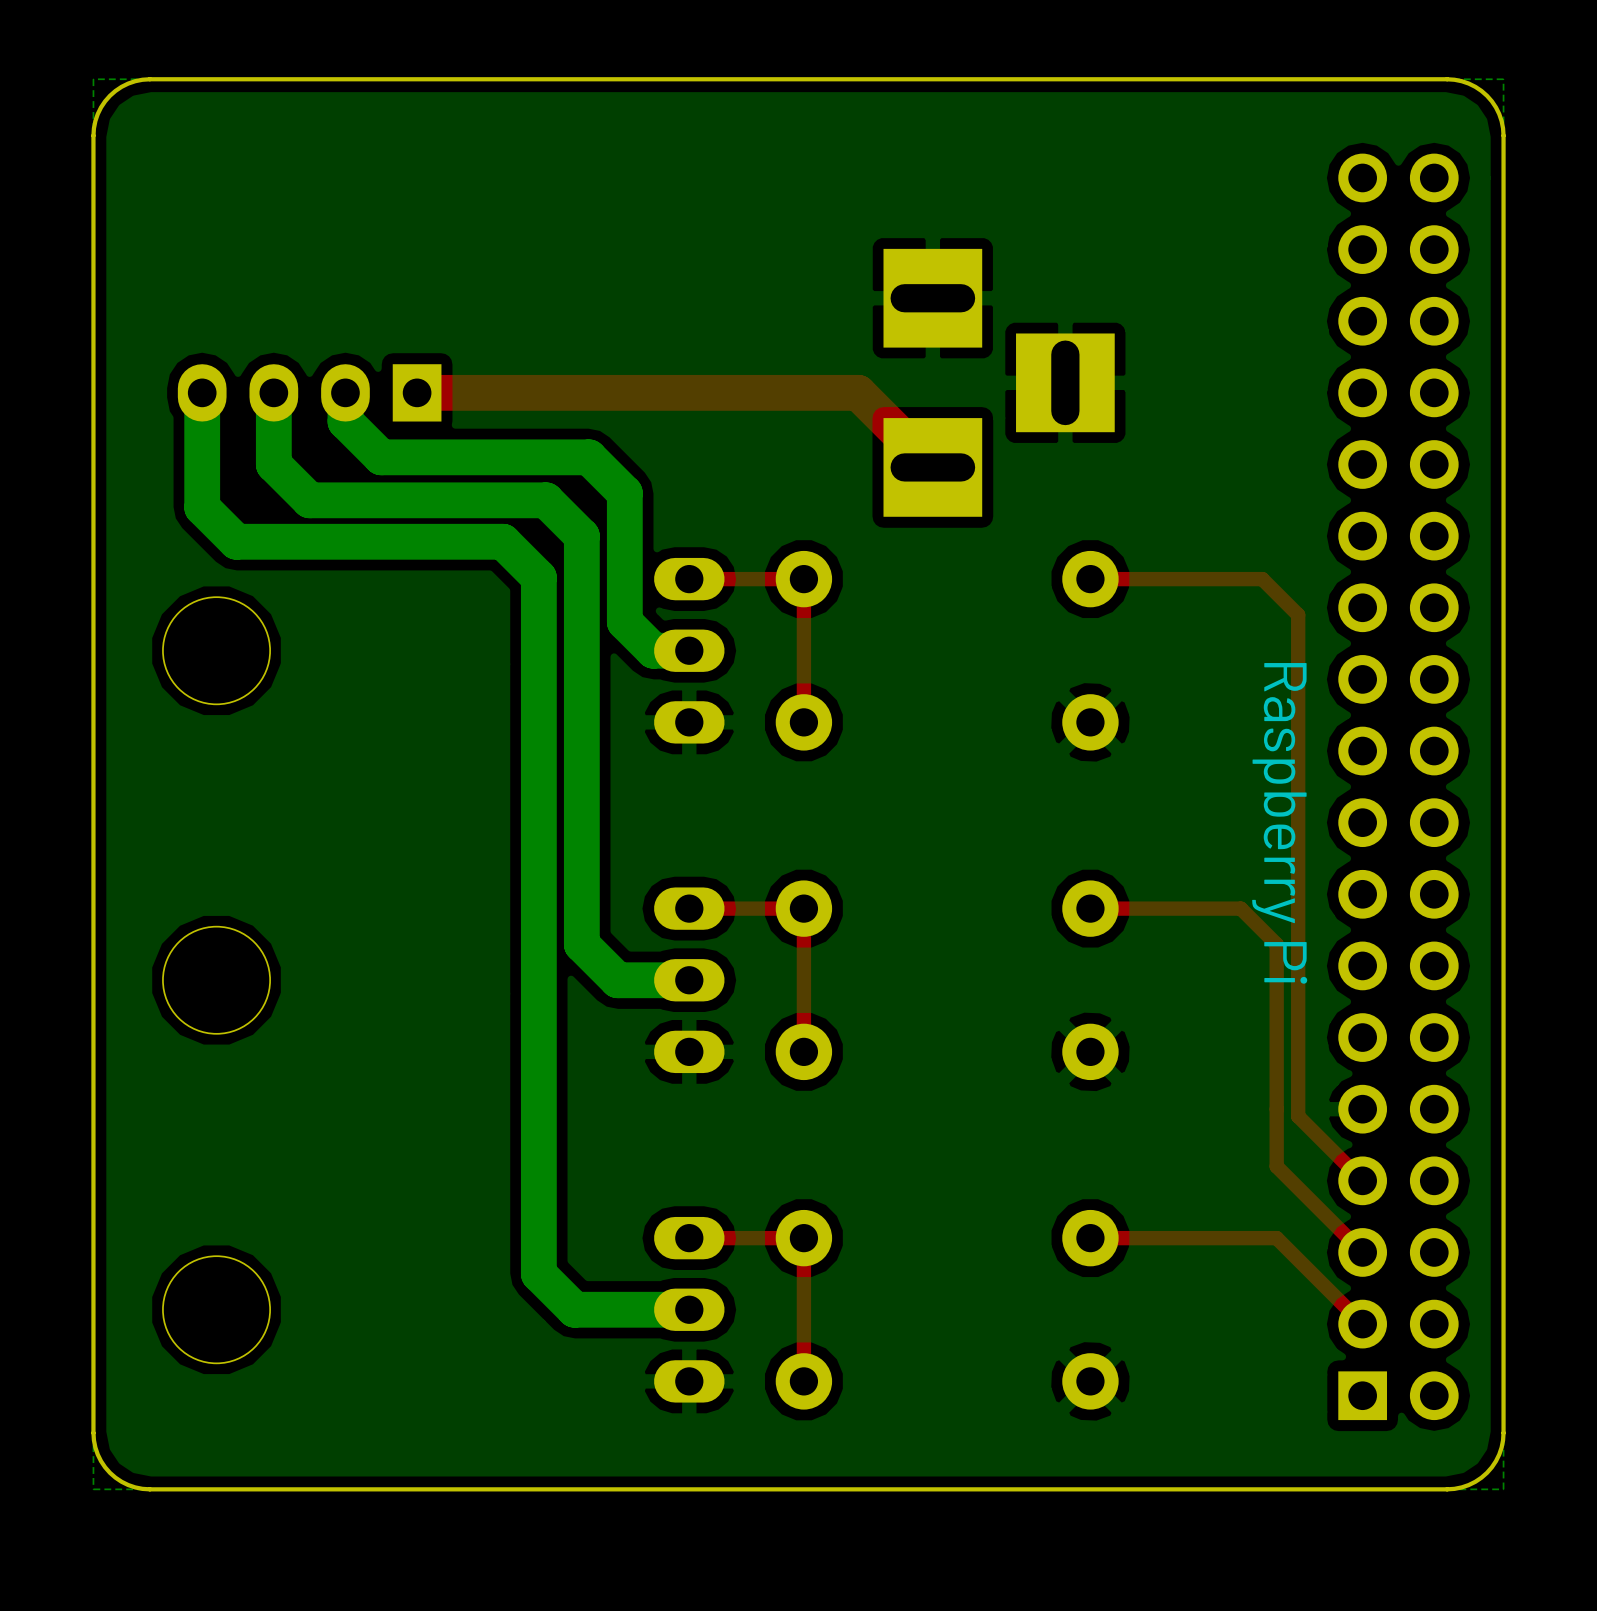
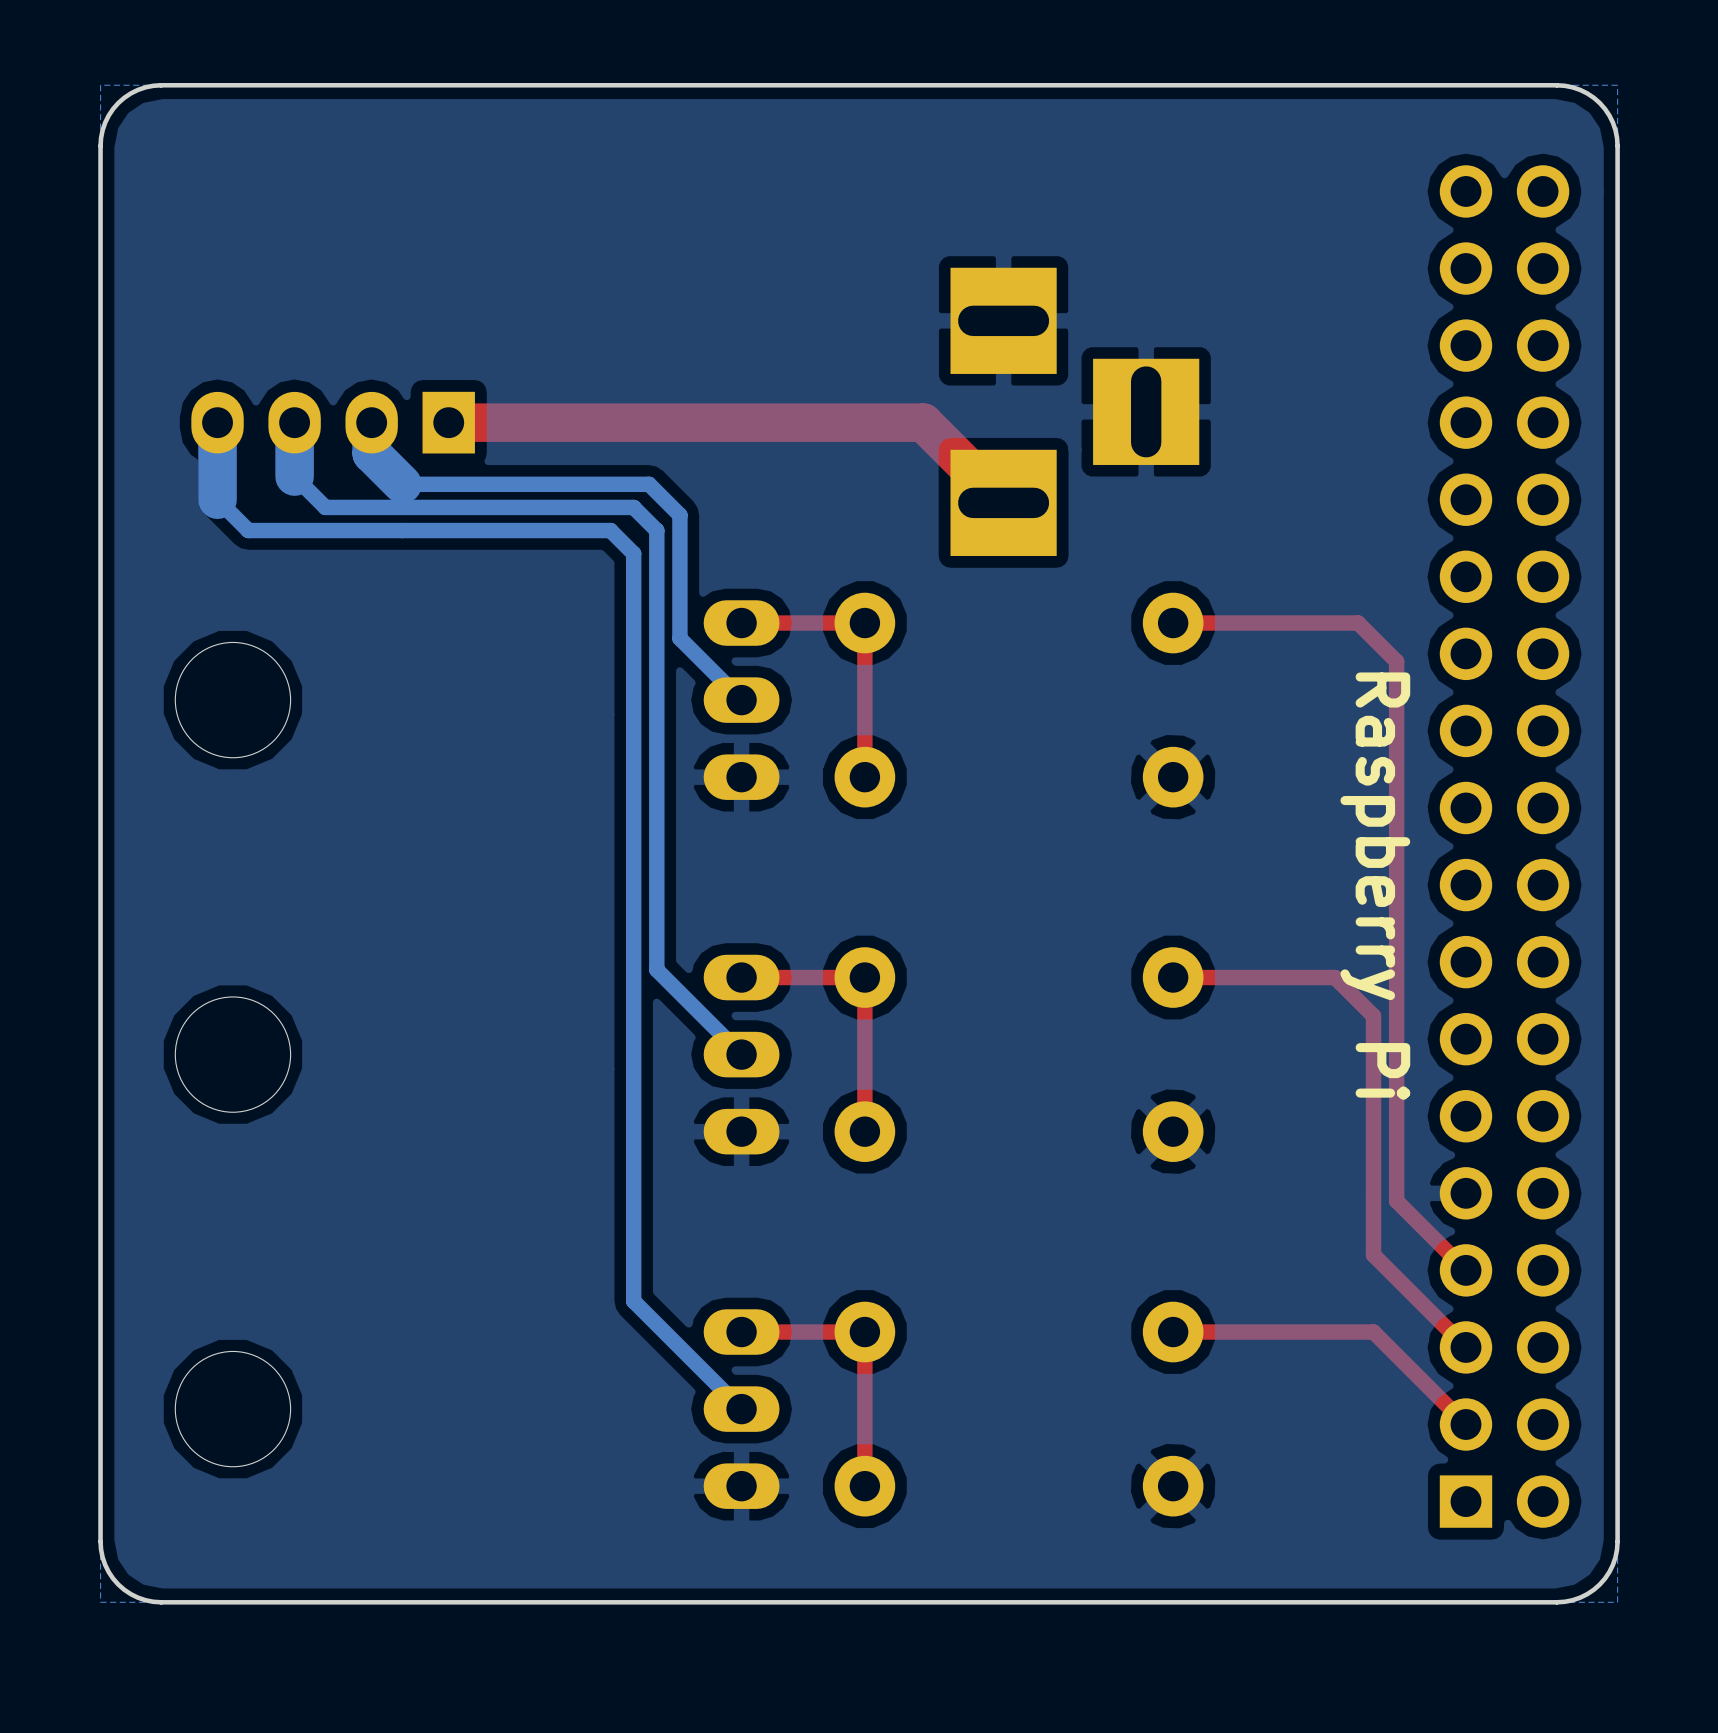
bottom track: (273, 443) (273, 464) (309, 500) (546, 500) (581, 536) (581, 944) (617, 980) (689, 980) -> (294, 476) (325, 507) (633, 507) (656, 530) (656, 969) (741, 1054)
bottom track: (374, 450) (381, 457) (589, 457) (624, 493) (624, 622) (653, 650) (689, 650) -> (402, 484) (649, 484) (679, 515) (679, 638) (741, 700)
bottom track: (202, 464) (202, 507) (236, 541) (503, 541) (538, 577) (538, 1273) (574, 1309) (689, 1309) -> (217, 499) (248, 530) (610, 530) (633, 553) (633, 1301) (741, 1409)

